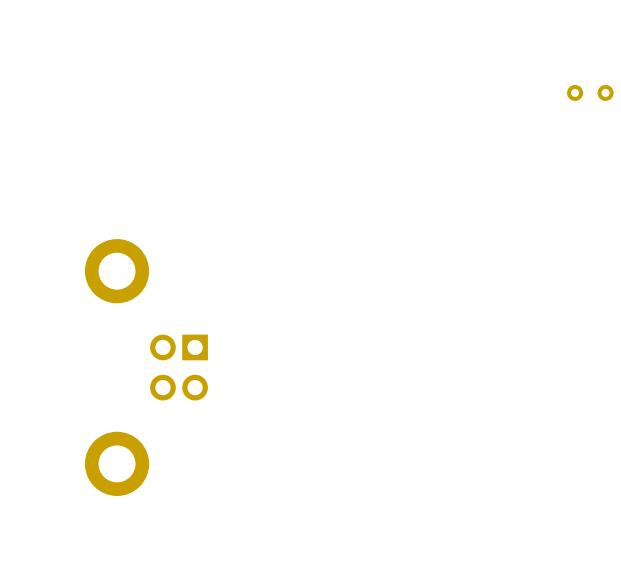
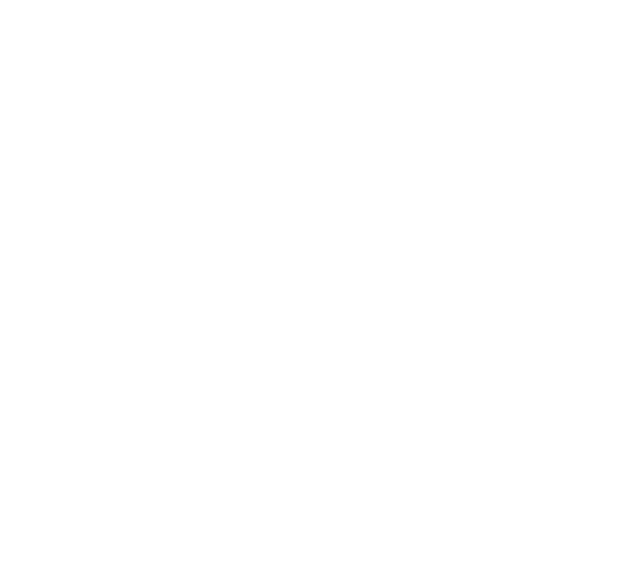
part: (590, 92) -> none
part: (146, 367) -> none

